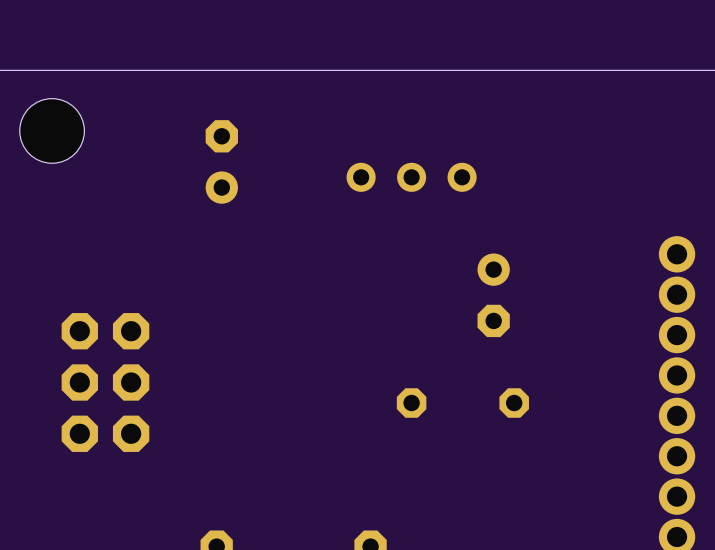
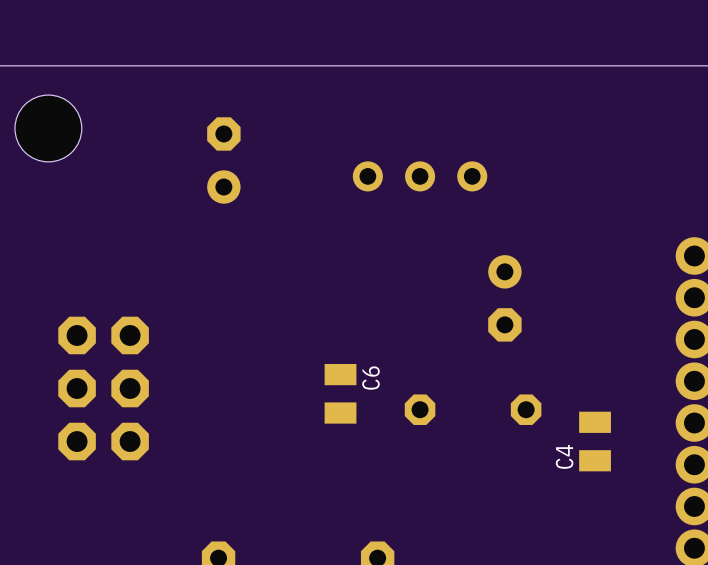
C6: none -> (340, 393)
C4: none -> (595, 441)

